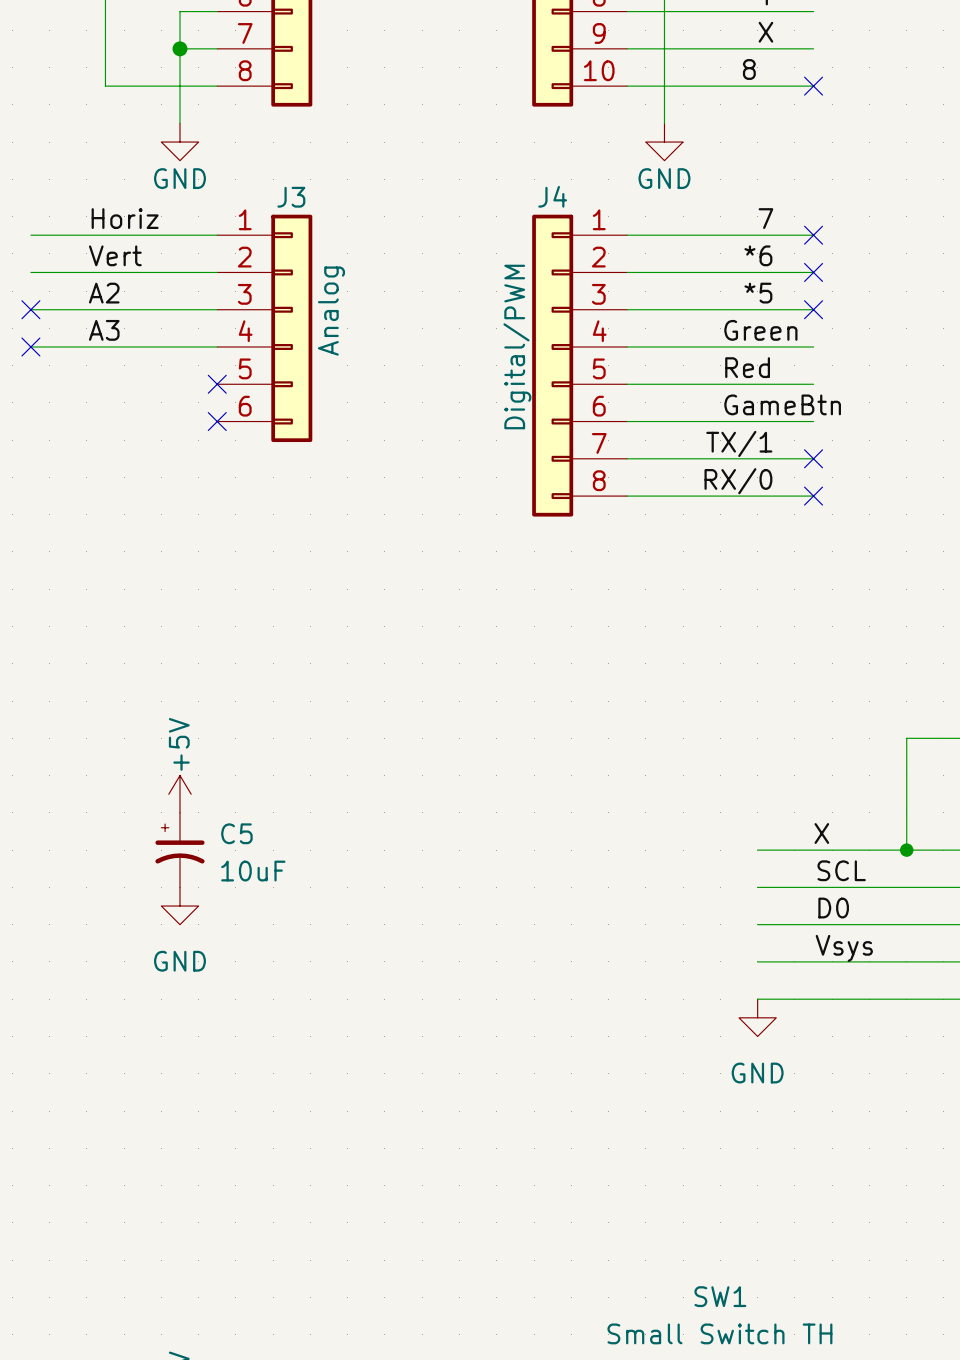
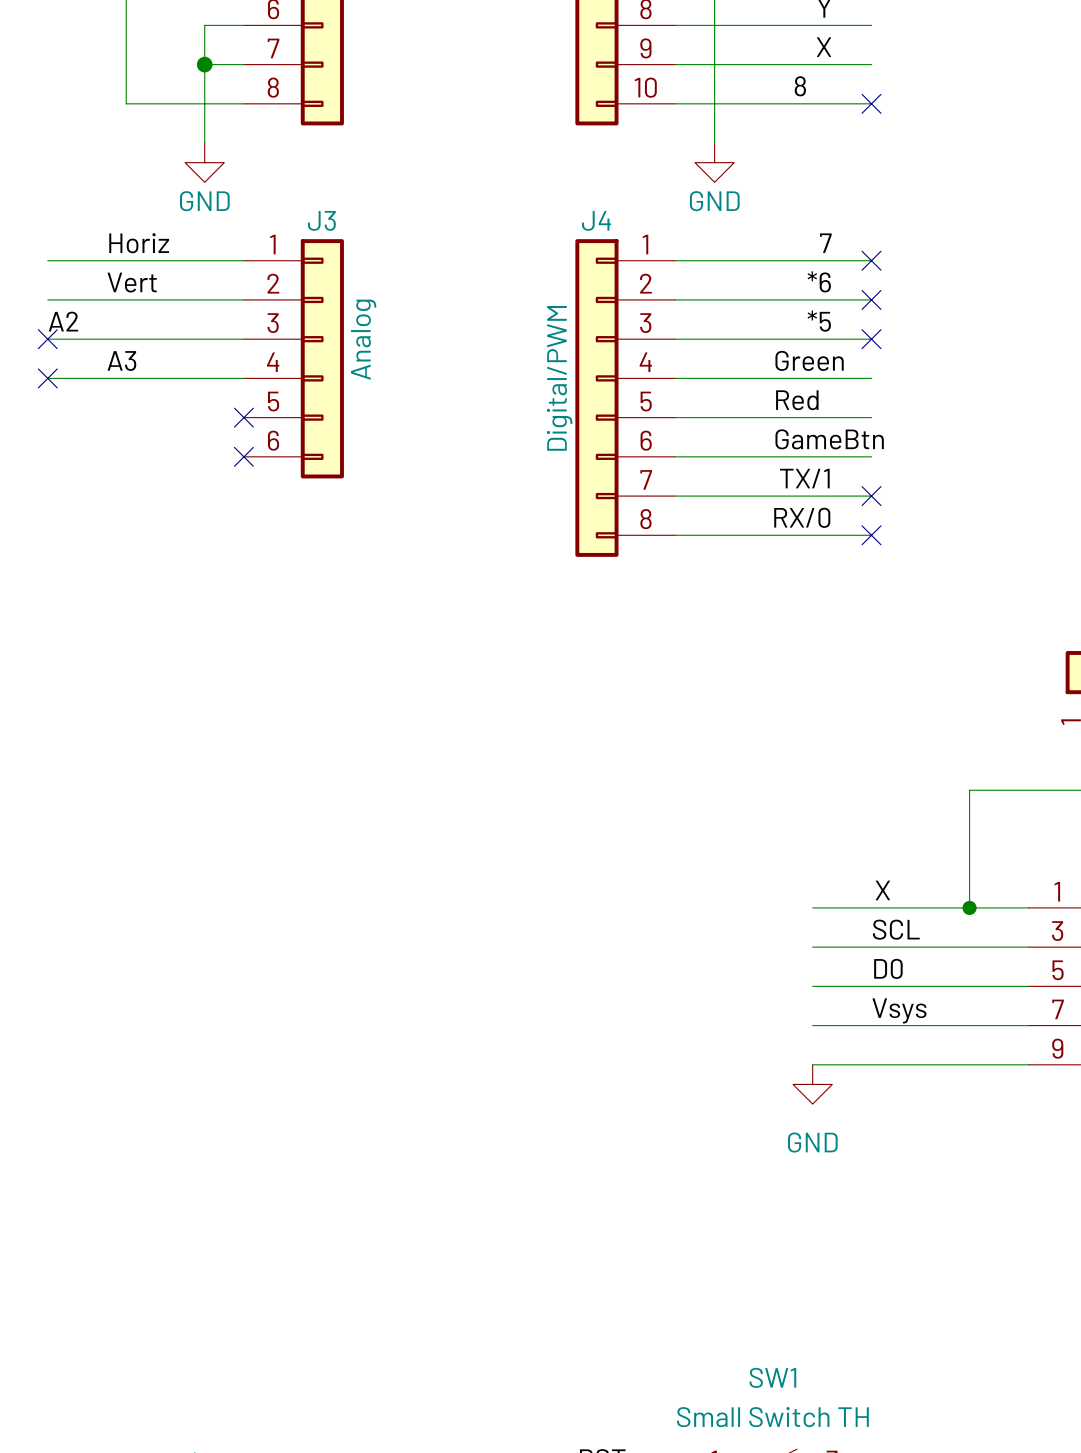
label position: A2 (104, 293) -> A2 (63, 321)
power symbol: +5V (179, 794) -> none
C5: 10uF (179, 850) -> none
power symbol: GND (179, 906) -> none

